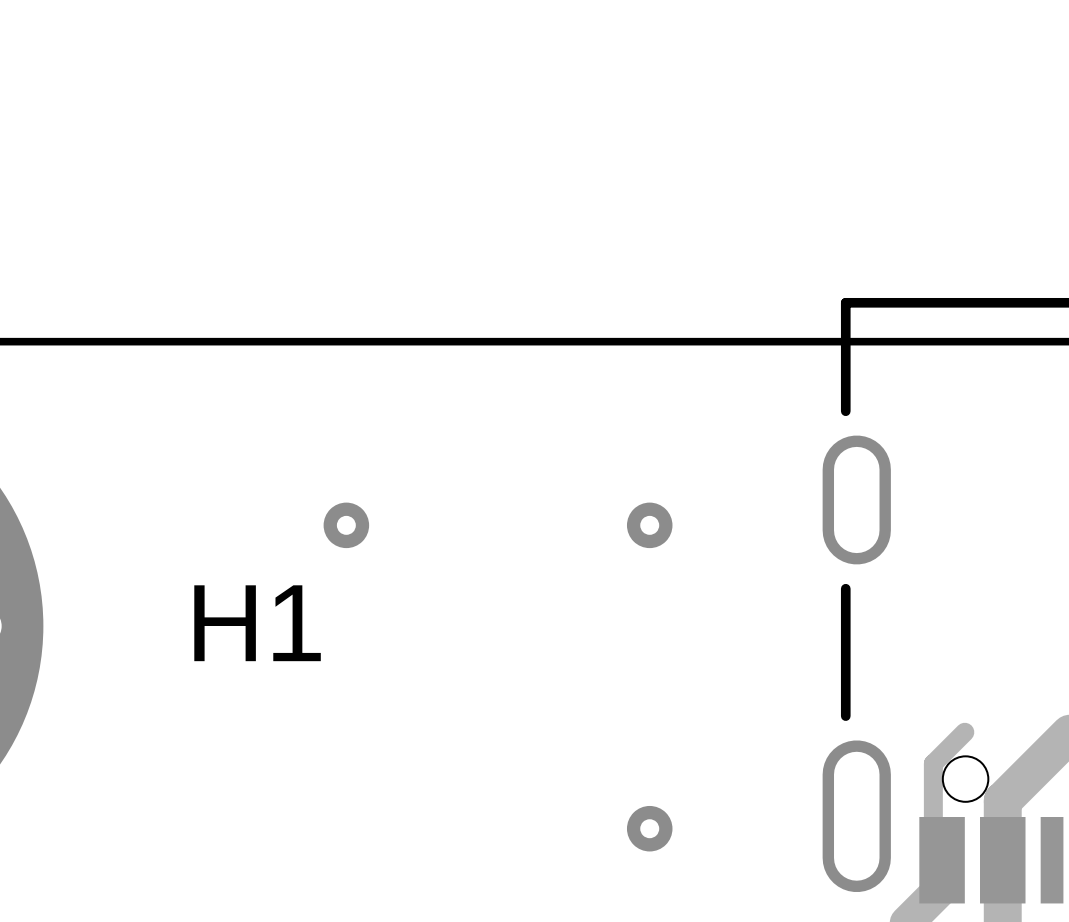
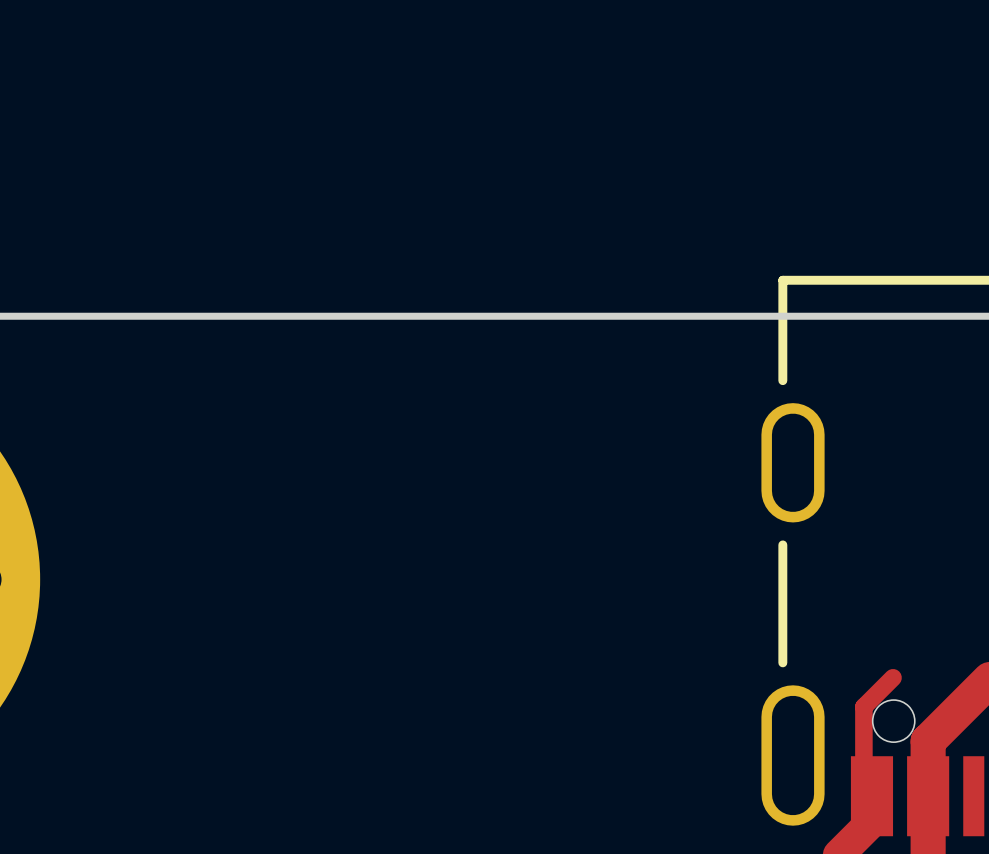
via: (346, 525) -> none
via: (649, 525) -> none
H1 name: H1 (257, 623) -> none
via: (649, 828) -> none

